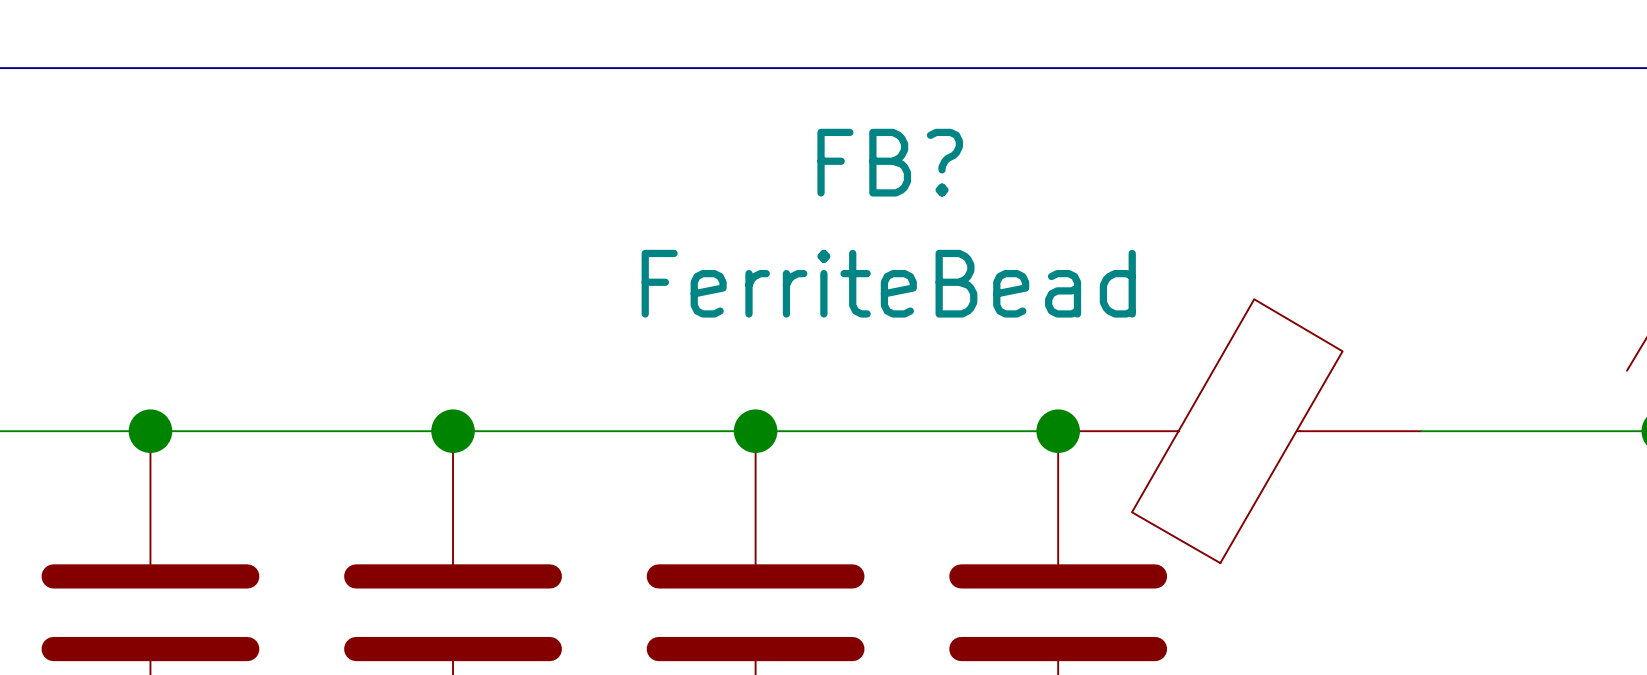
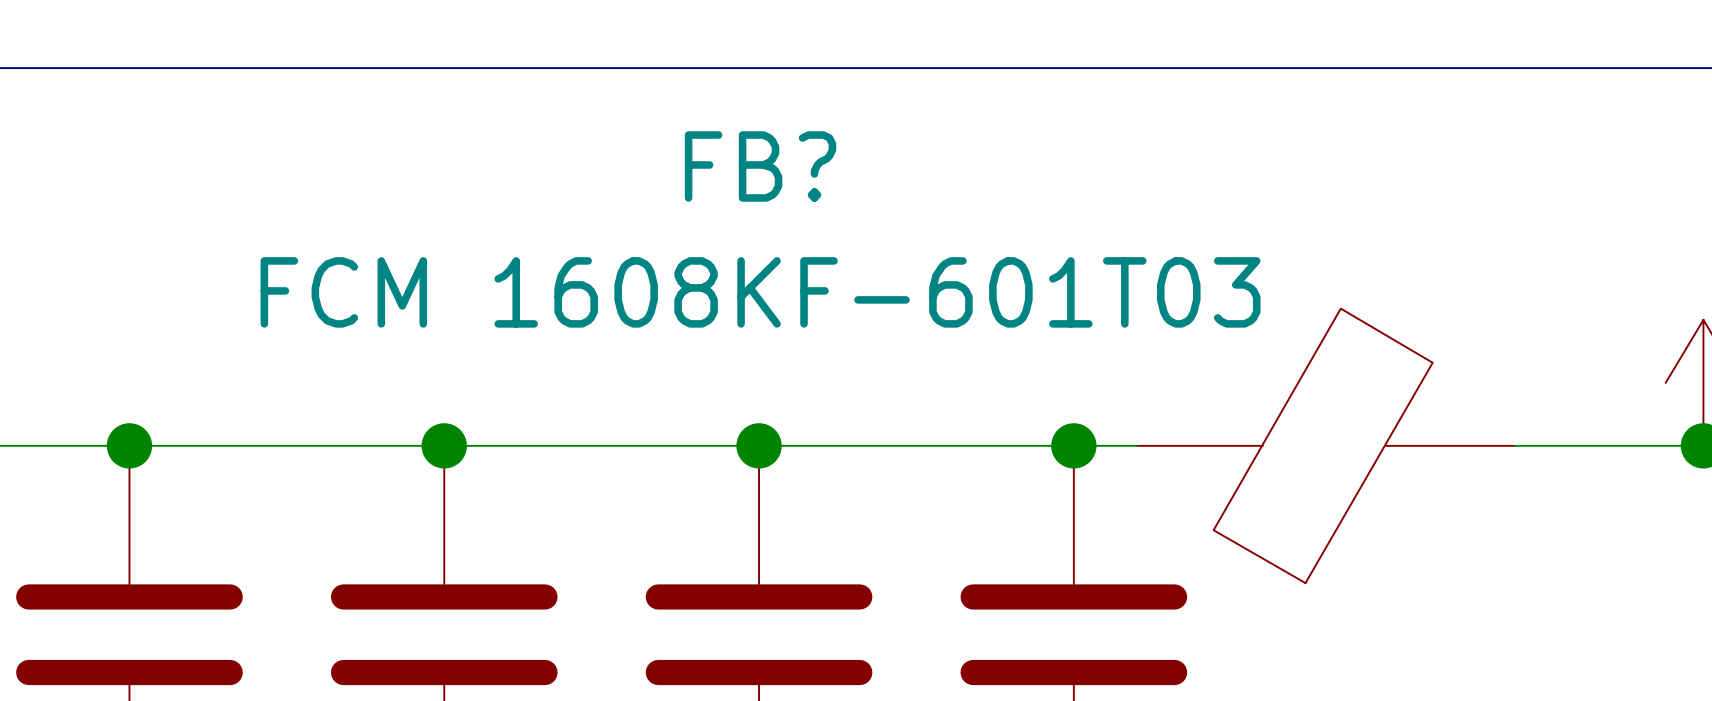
FB?: FerriteBead (1239, 431) -> none
FB?: none -> FCM 1608KF-601T03 (1325, 445)

